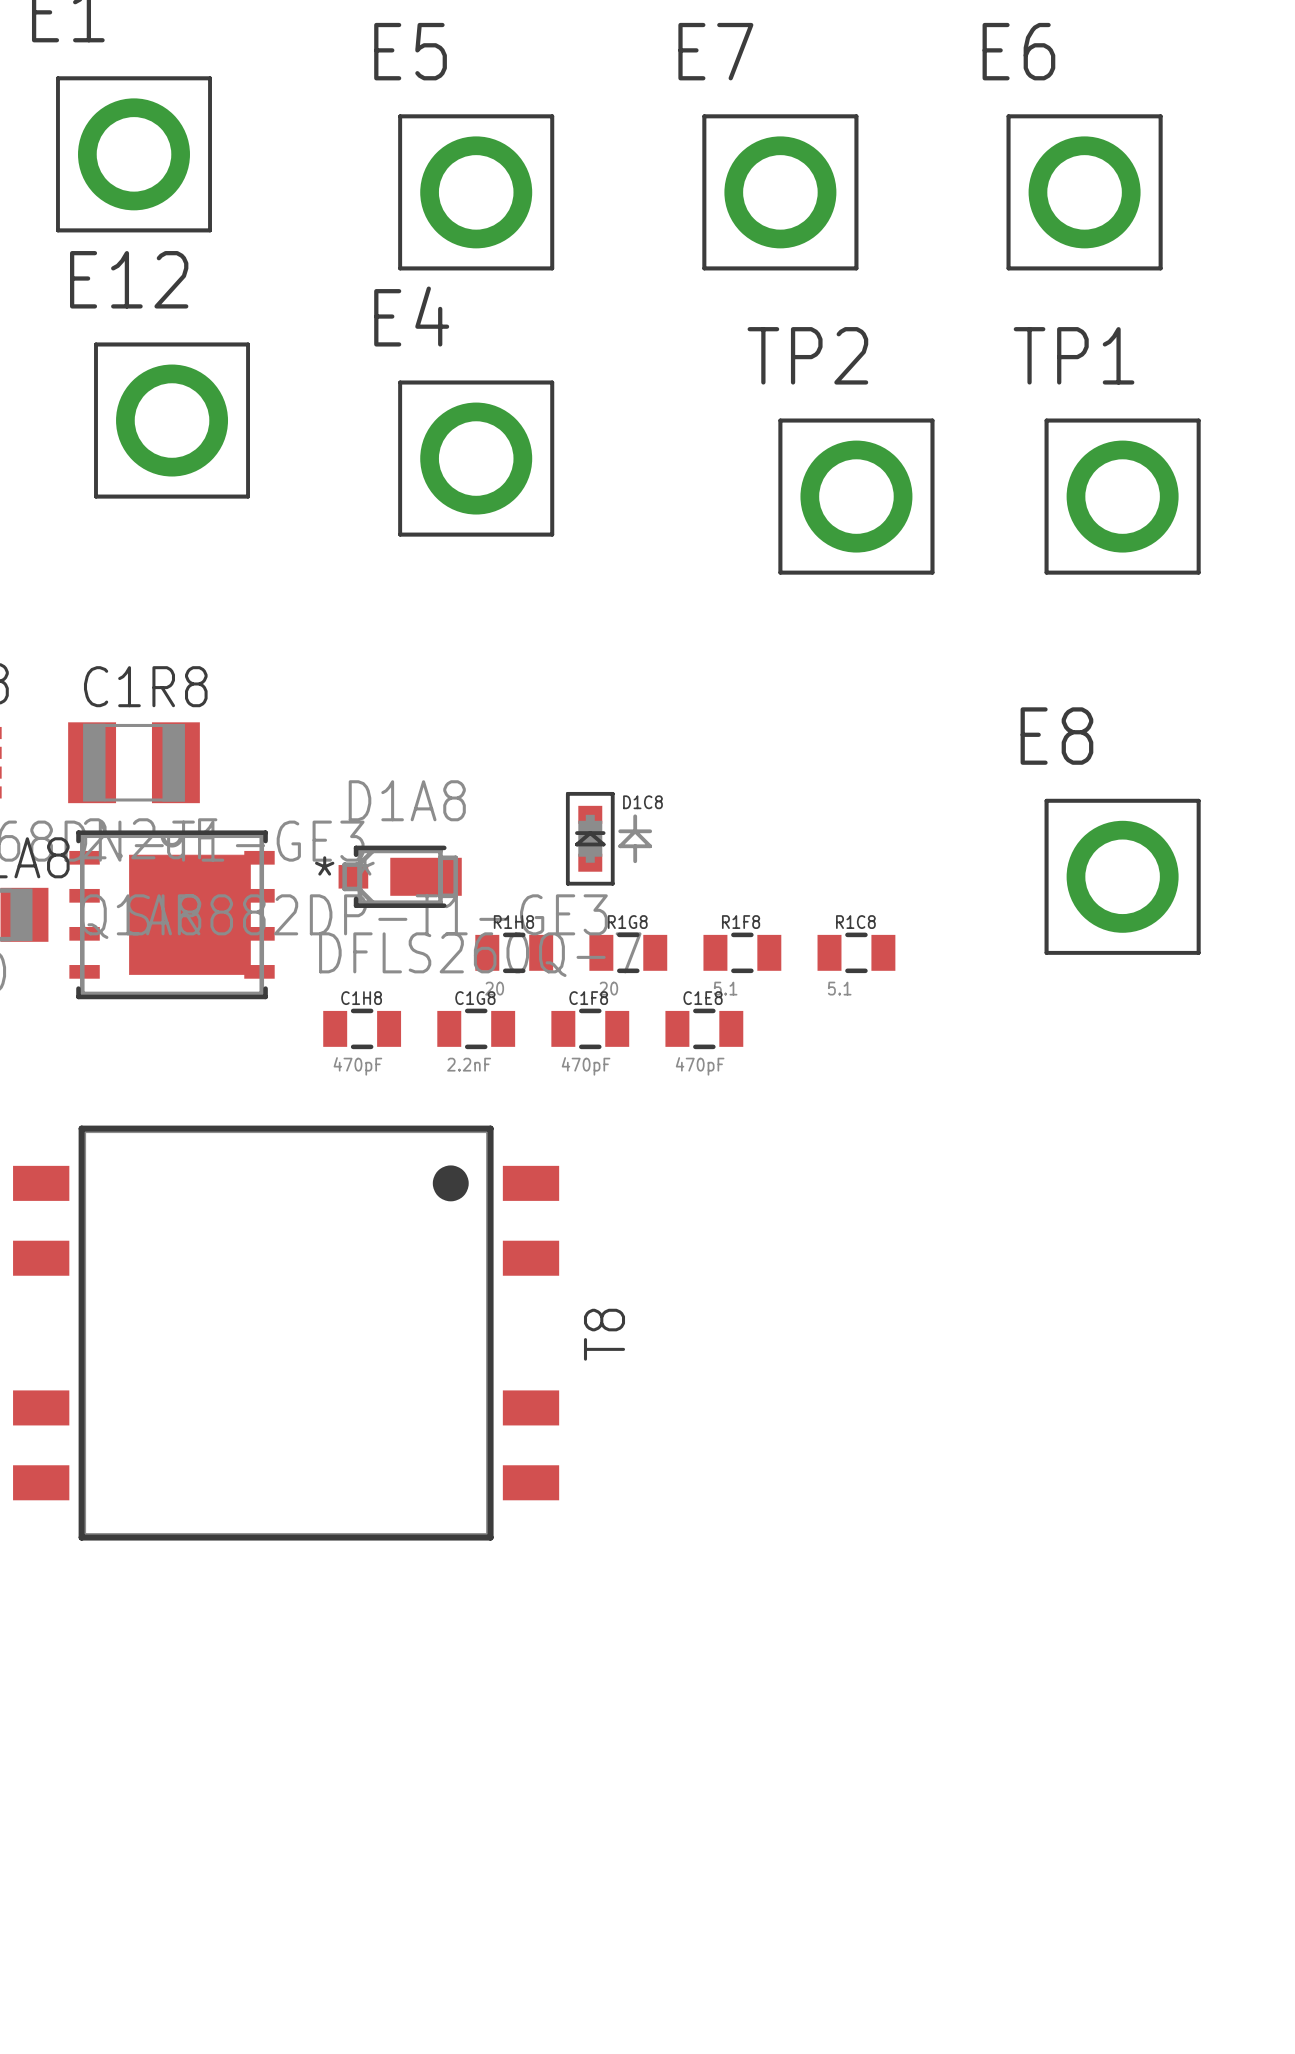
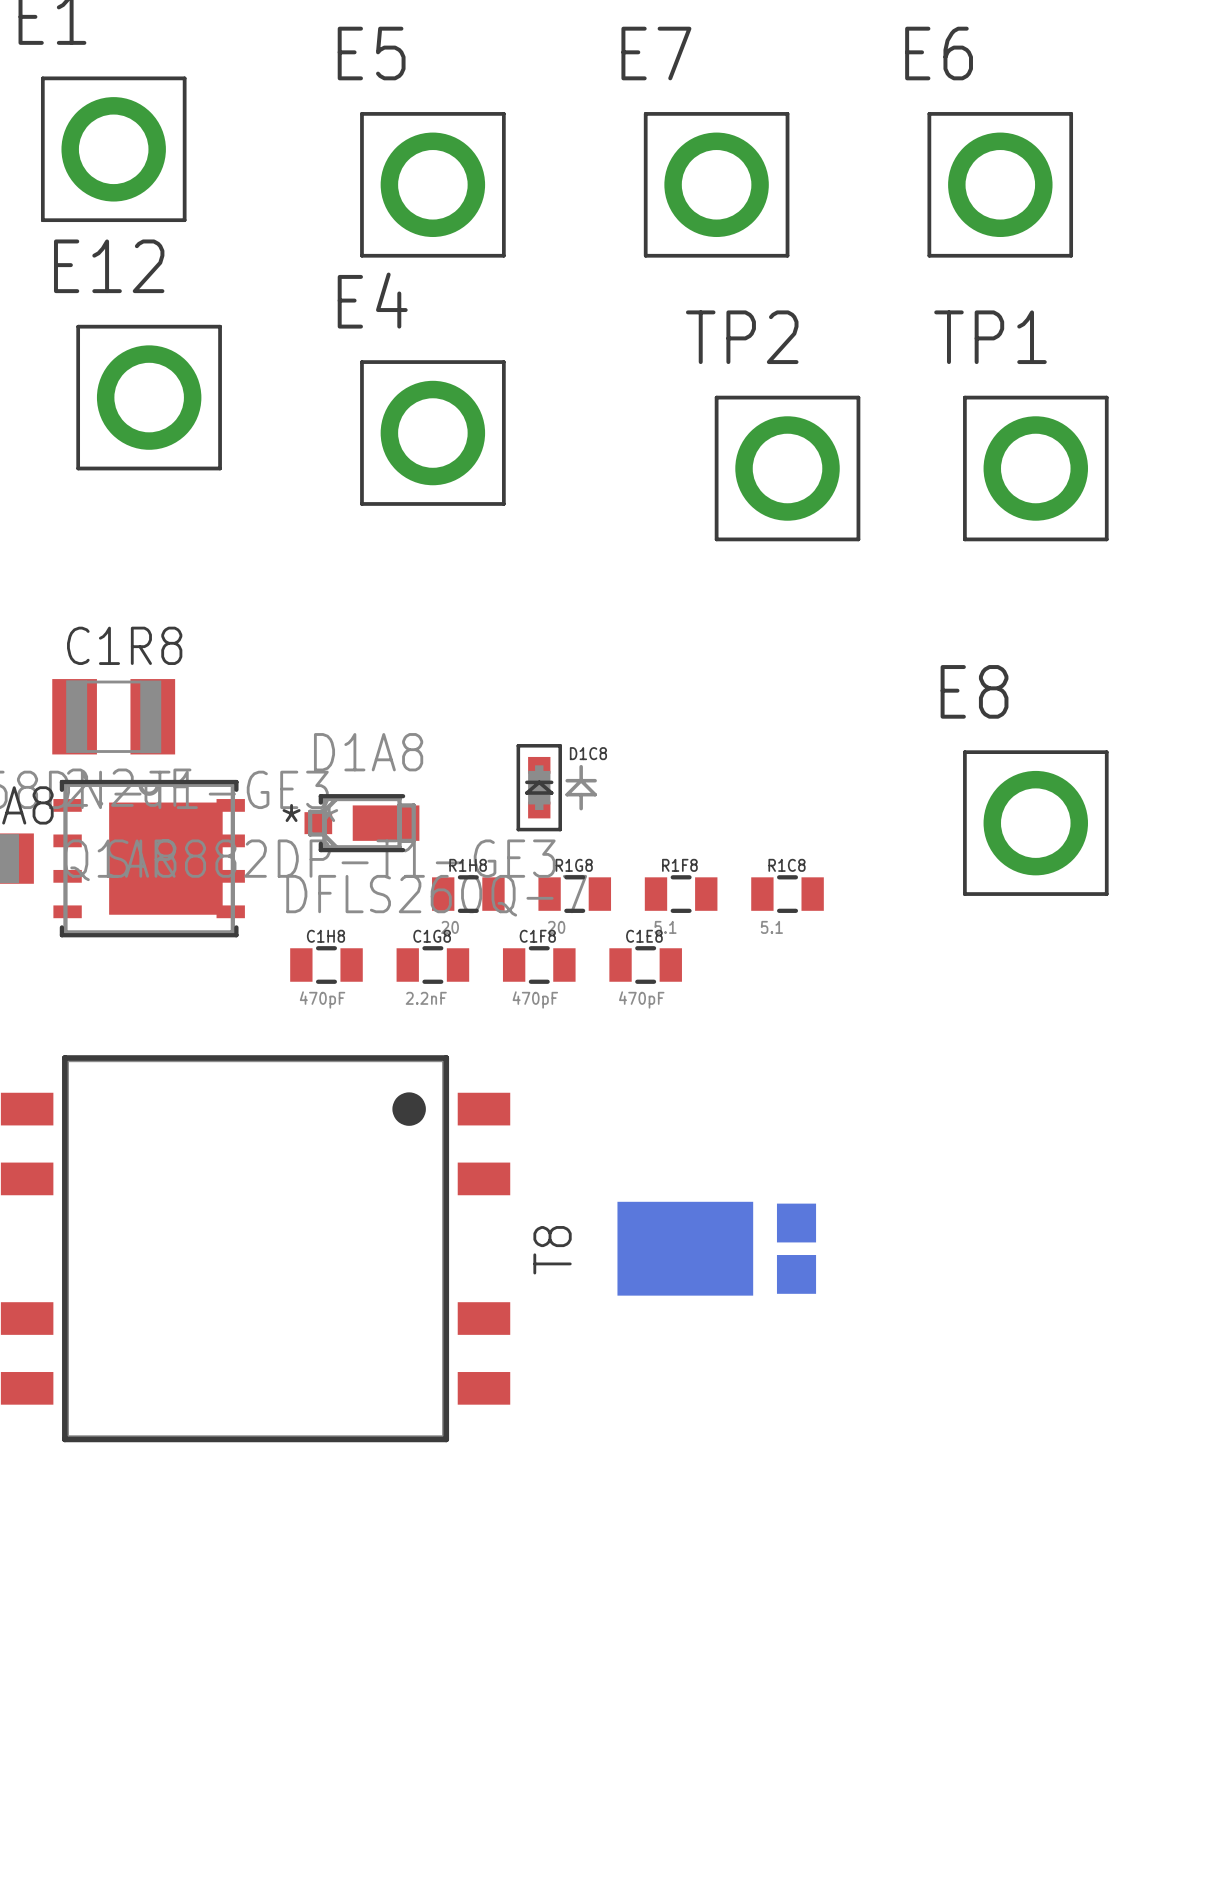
part: none -> (716, 1248)

